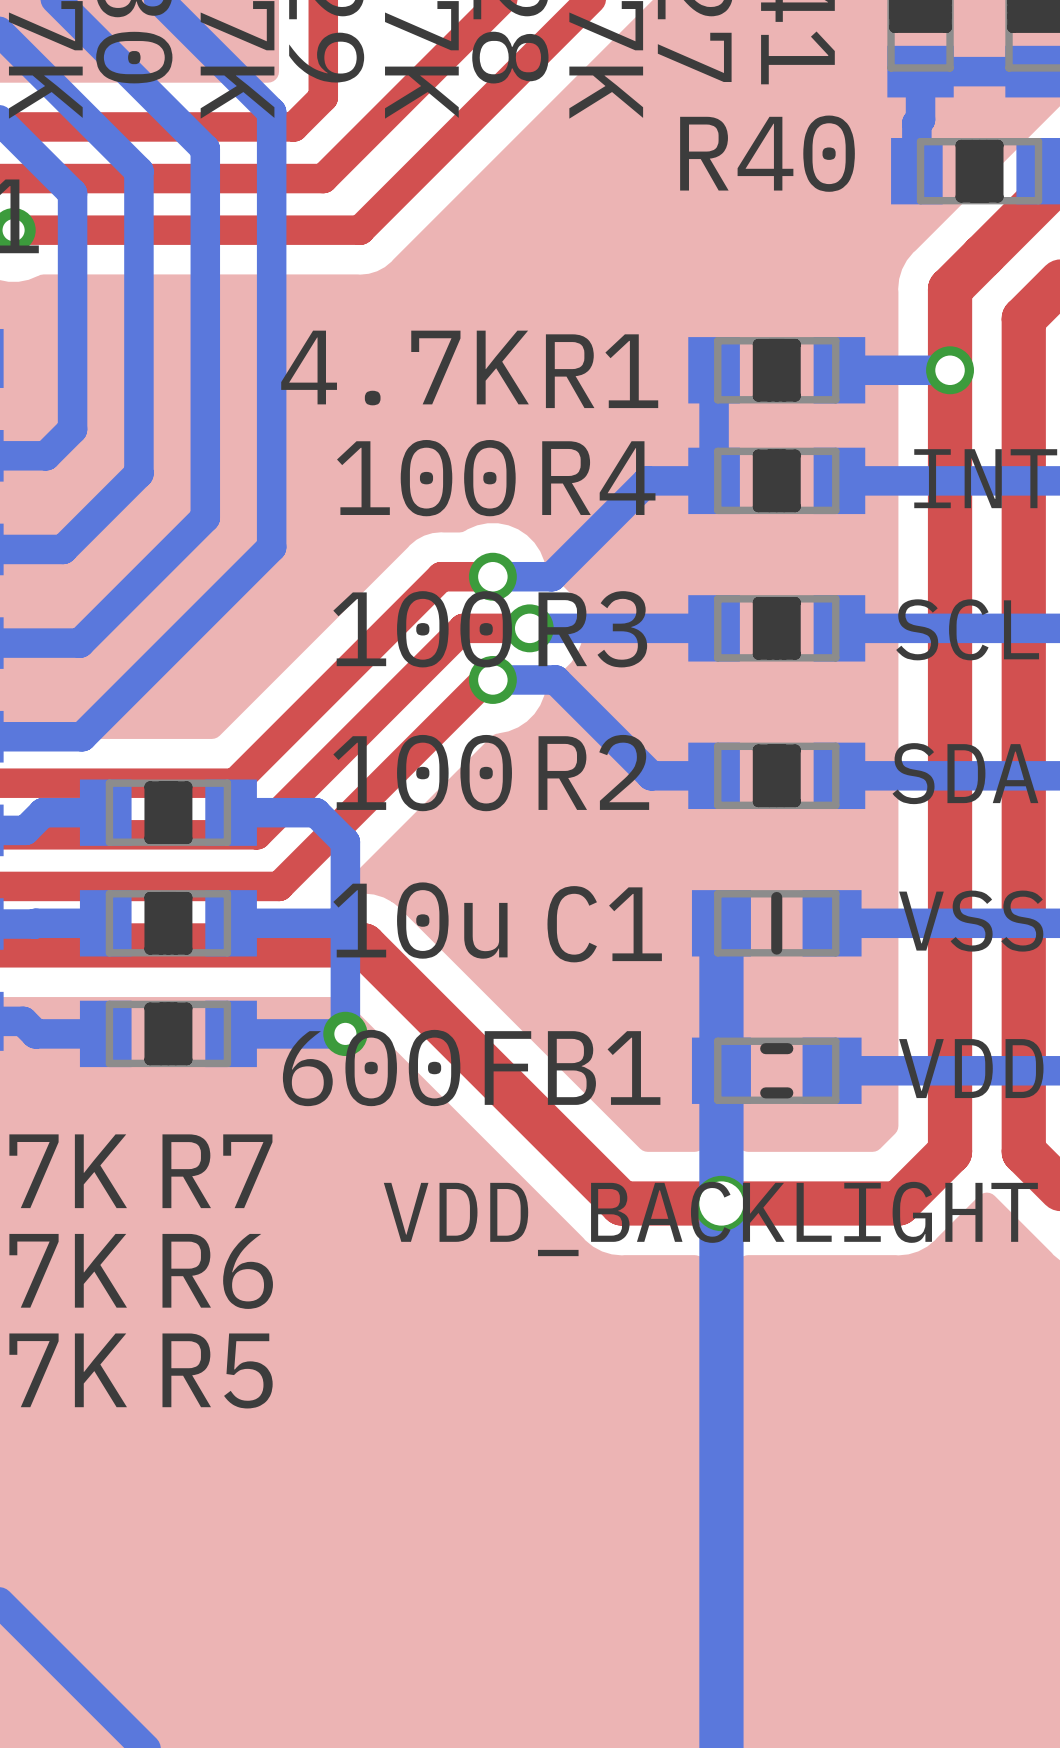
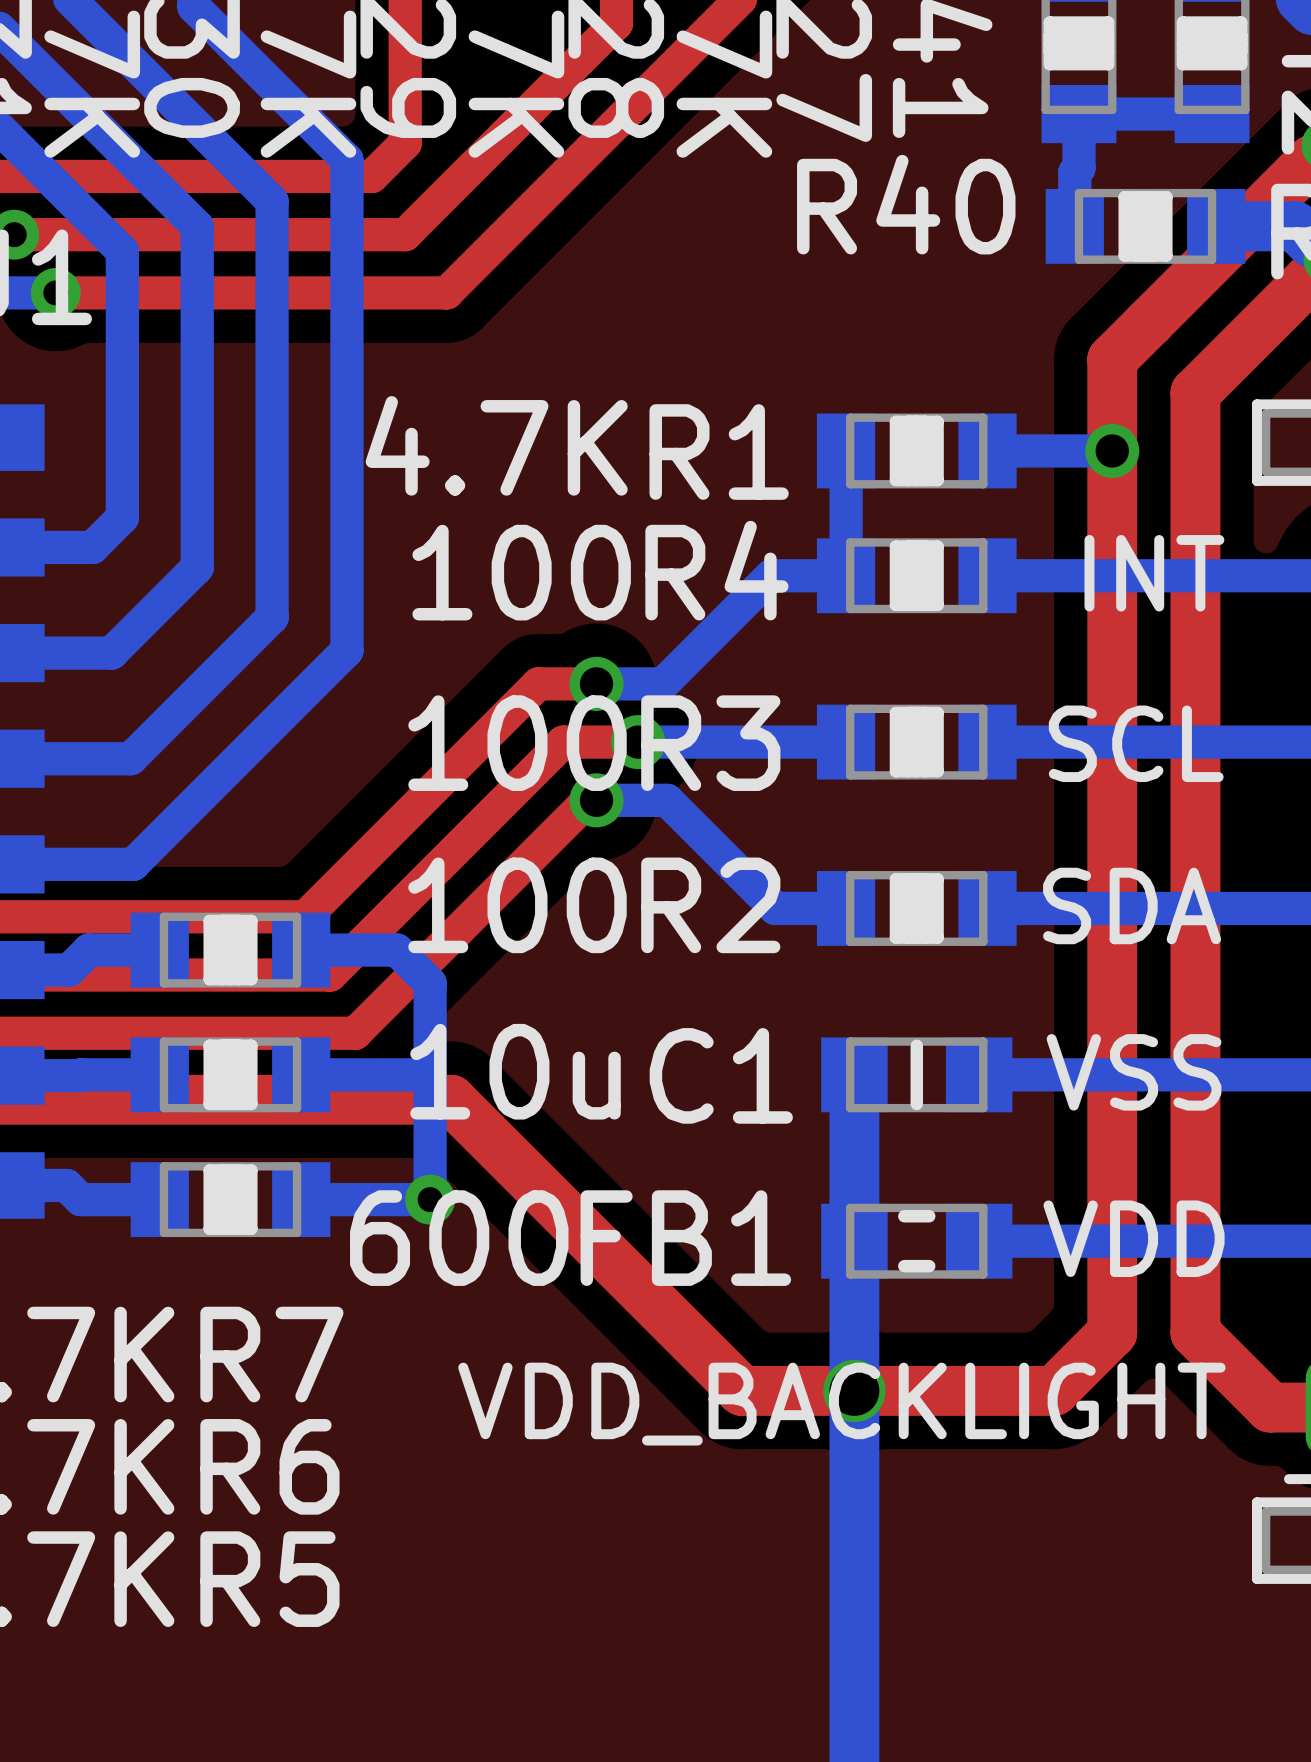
R7 name position: R7 (217, 1171) -> R7 (271, 1354)
R6 name position: R6 (217, 1271) -> R6 (269, 1466)
R5 name position: R5 (217, 1370) -> R5 (269, 1579)

